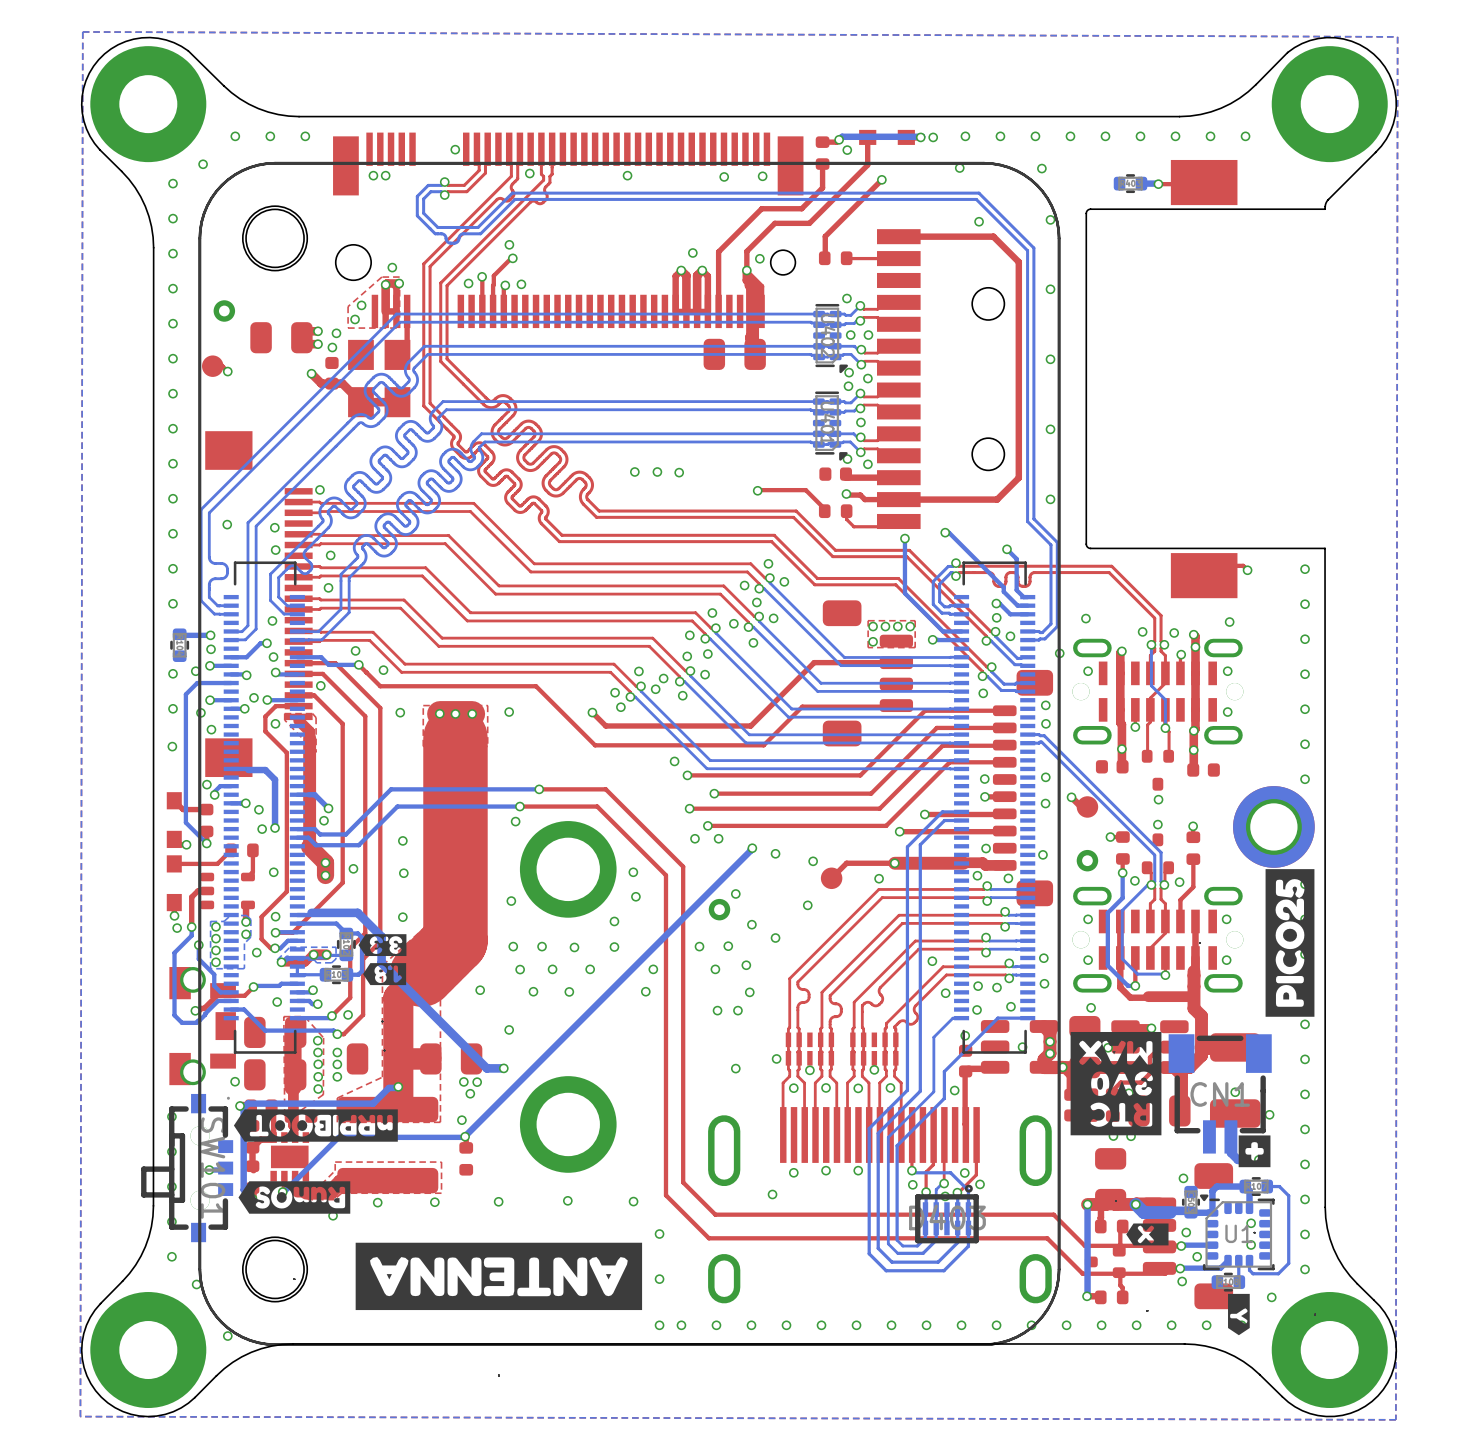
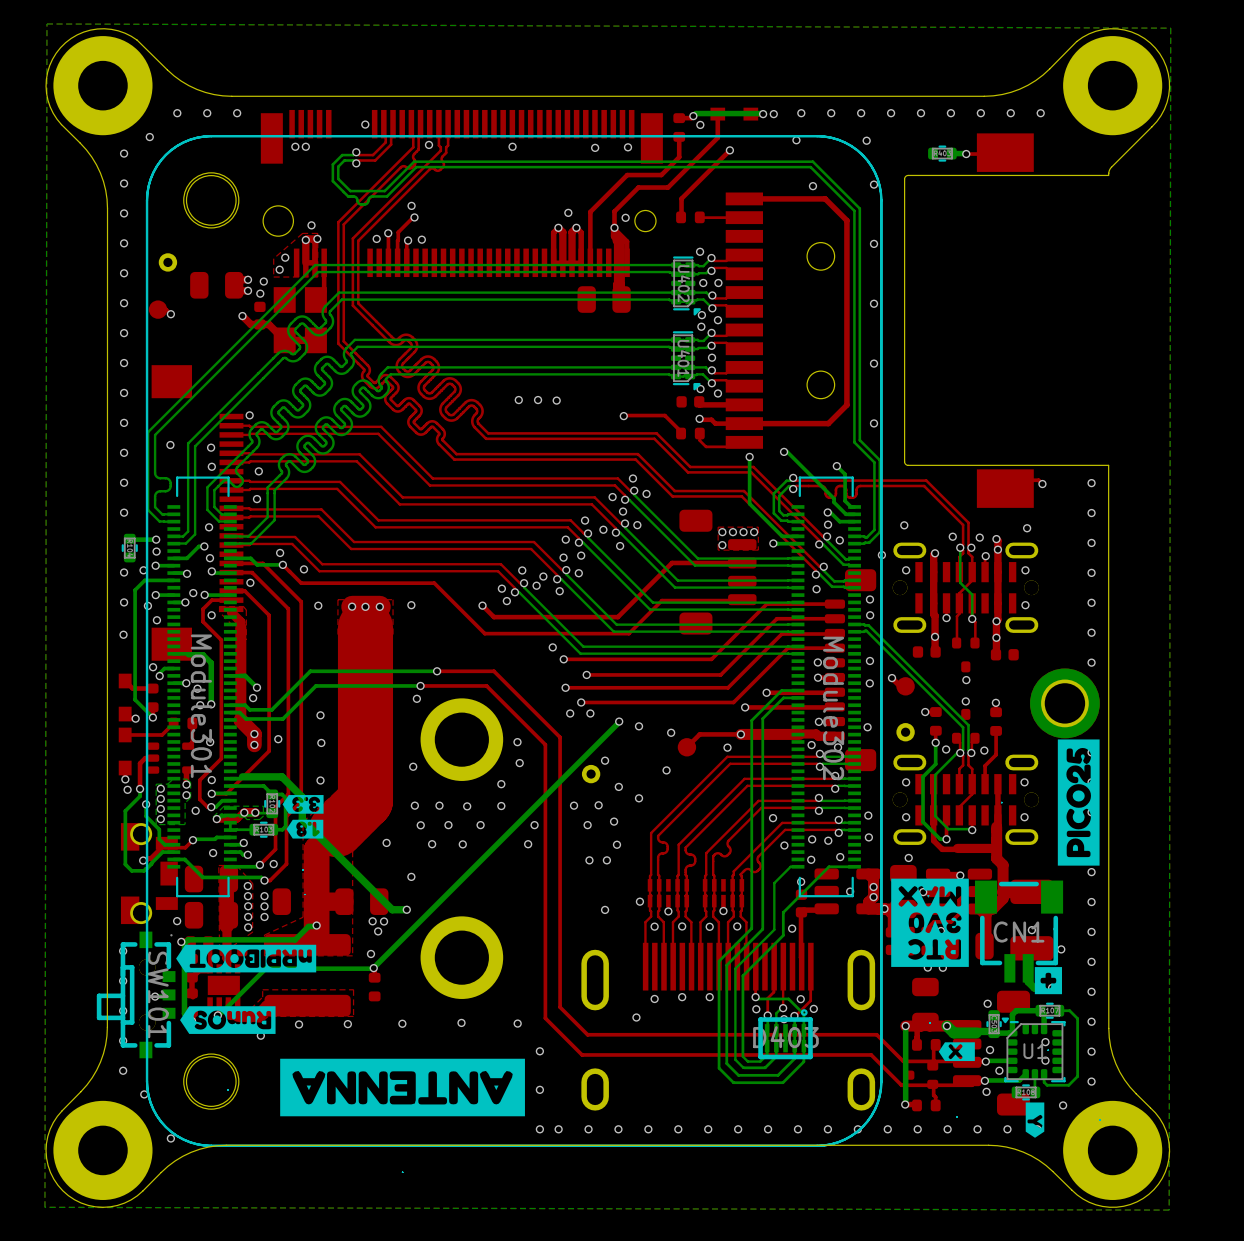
Module301 name: none -> Module301 (201, 706)
Module302 name: none -> Module302 (833, 708)

